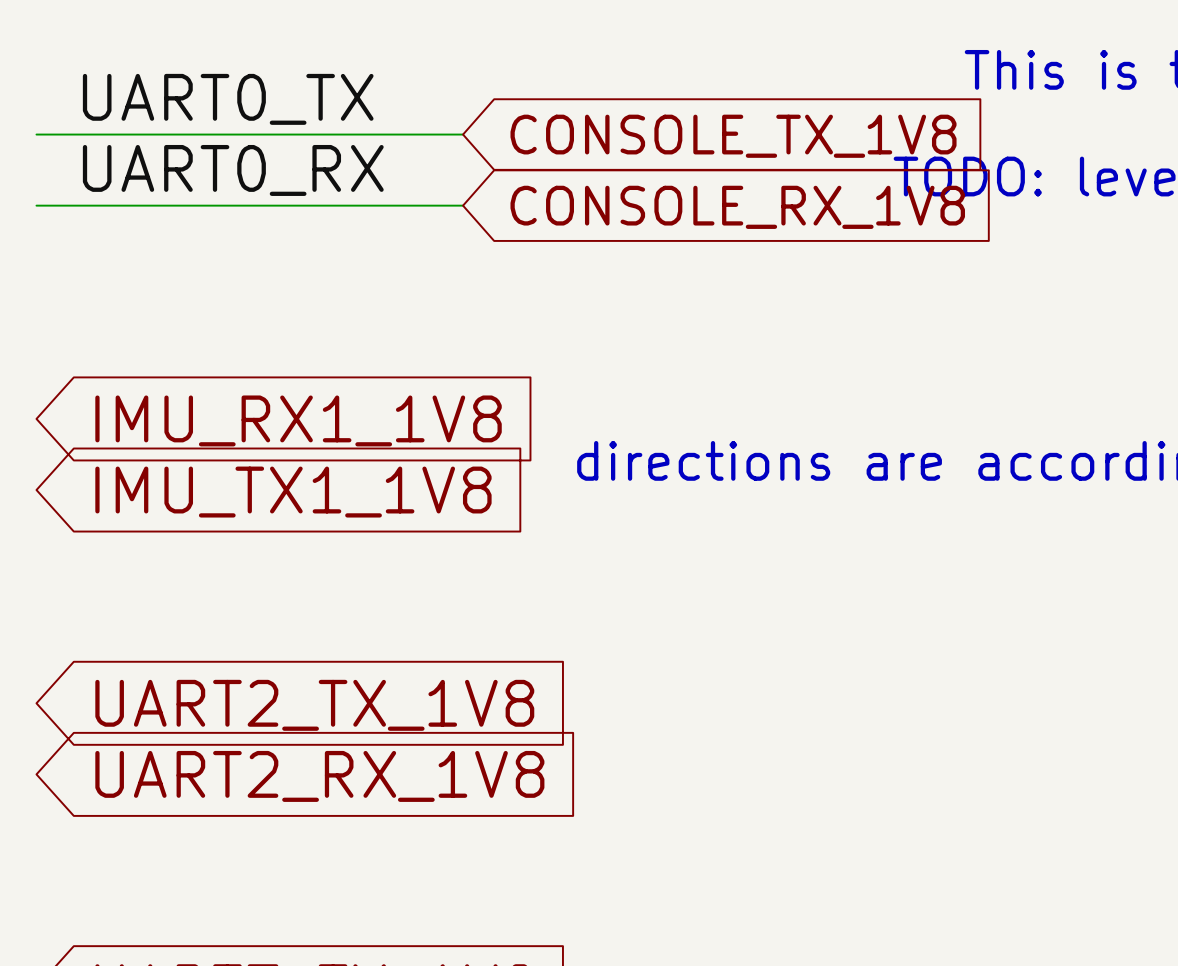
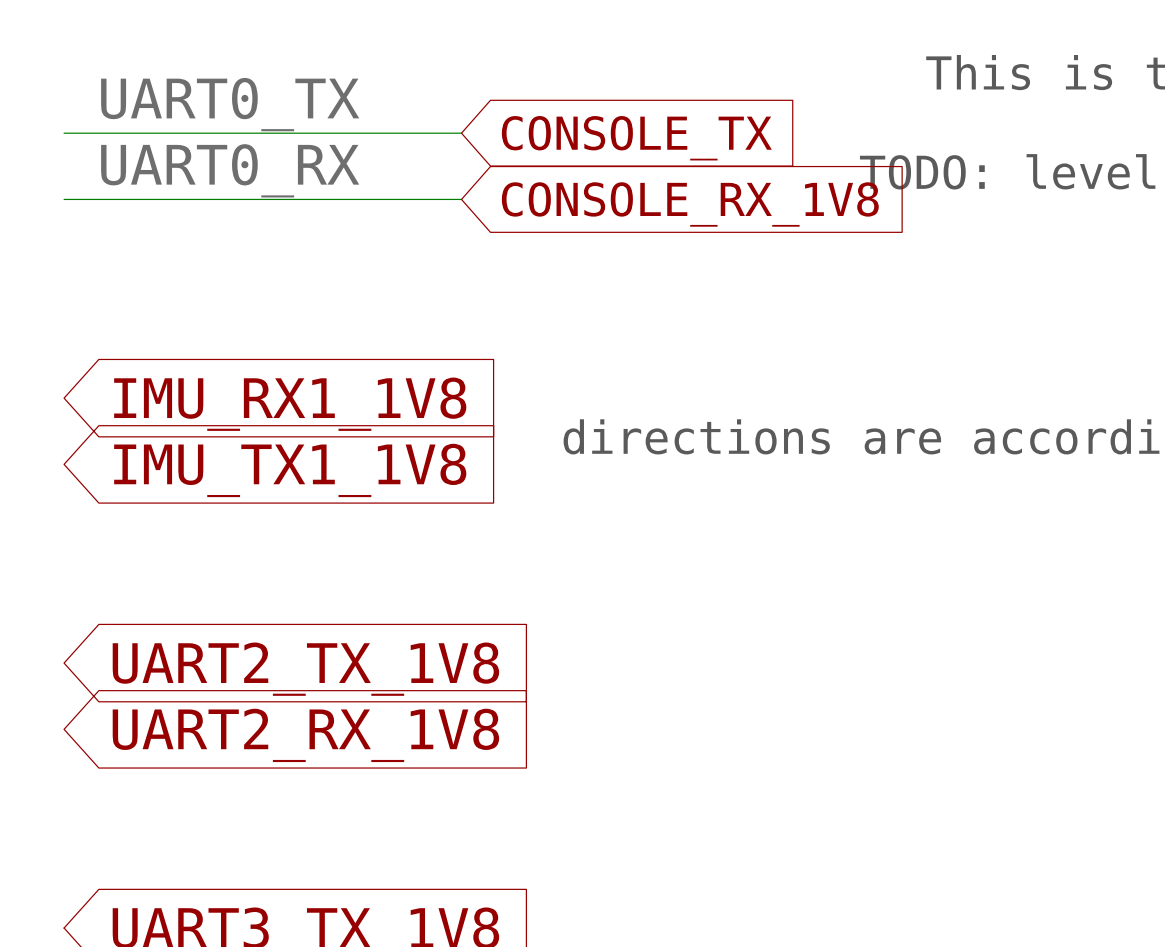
global label: CONSOLE_TX_1V8 (733, 136) -> CONSOLE_TX (636, 138)

